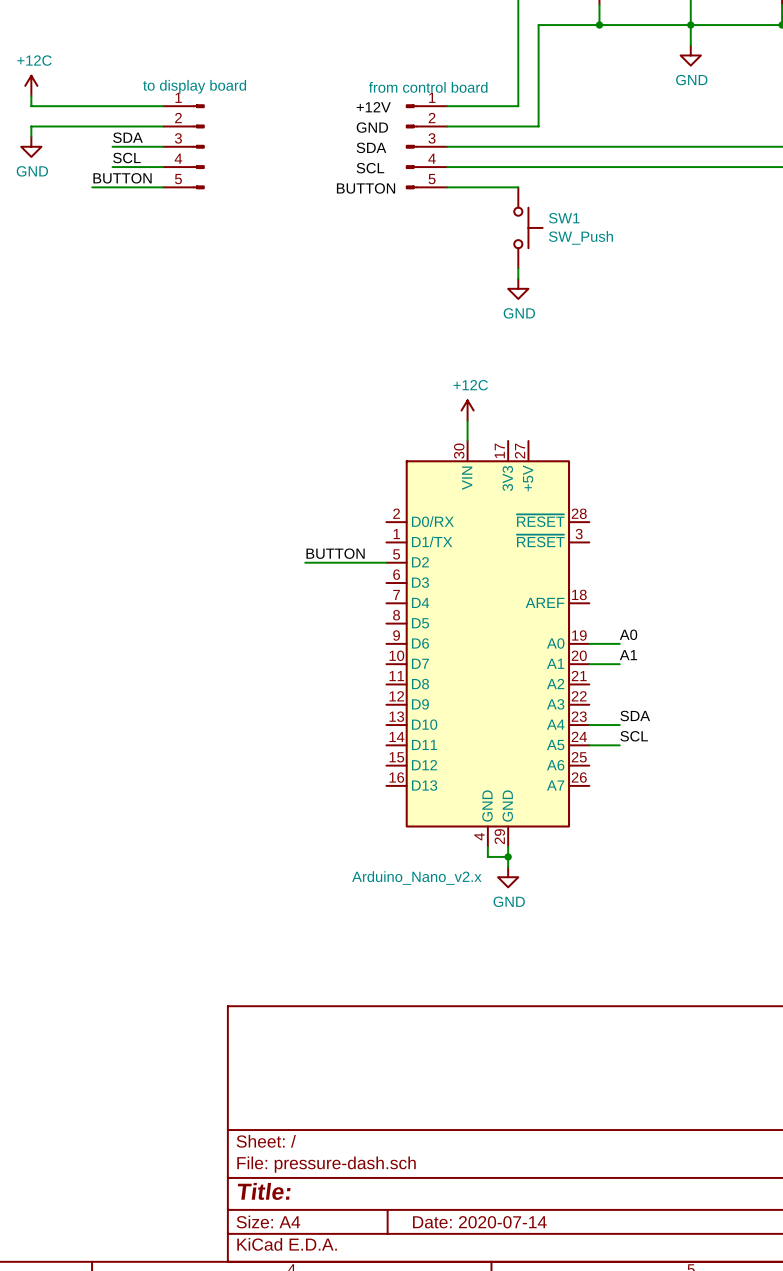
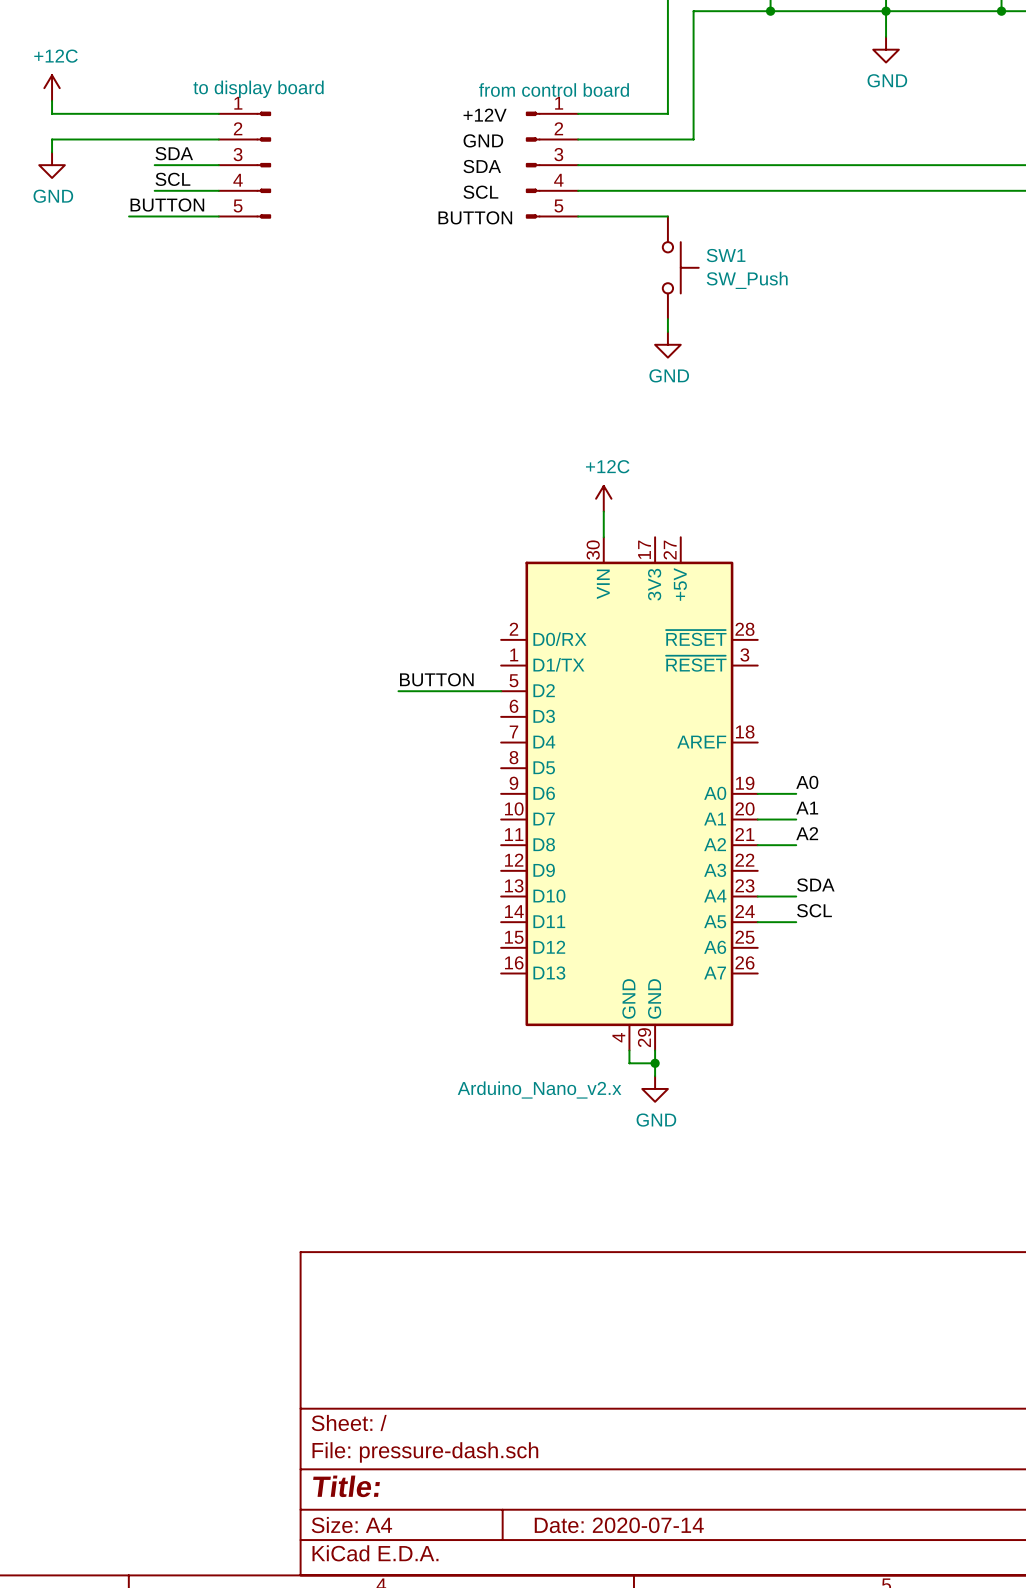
label: none -> A2 (807, 833)
wire: none -> (757, 845) (796, 845)

